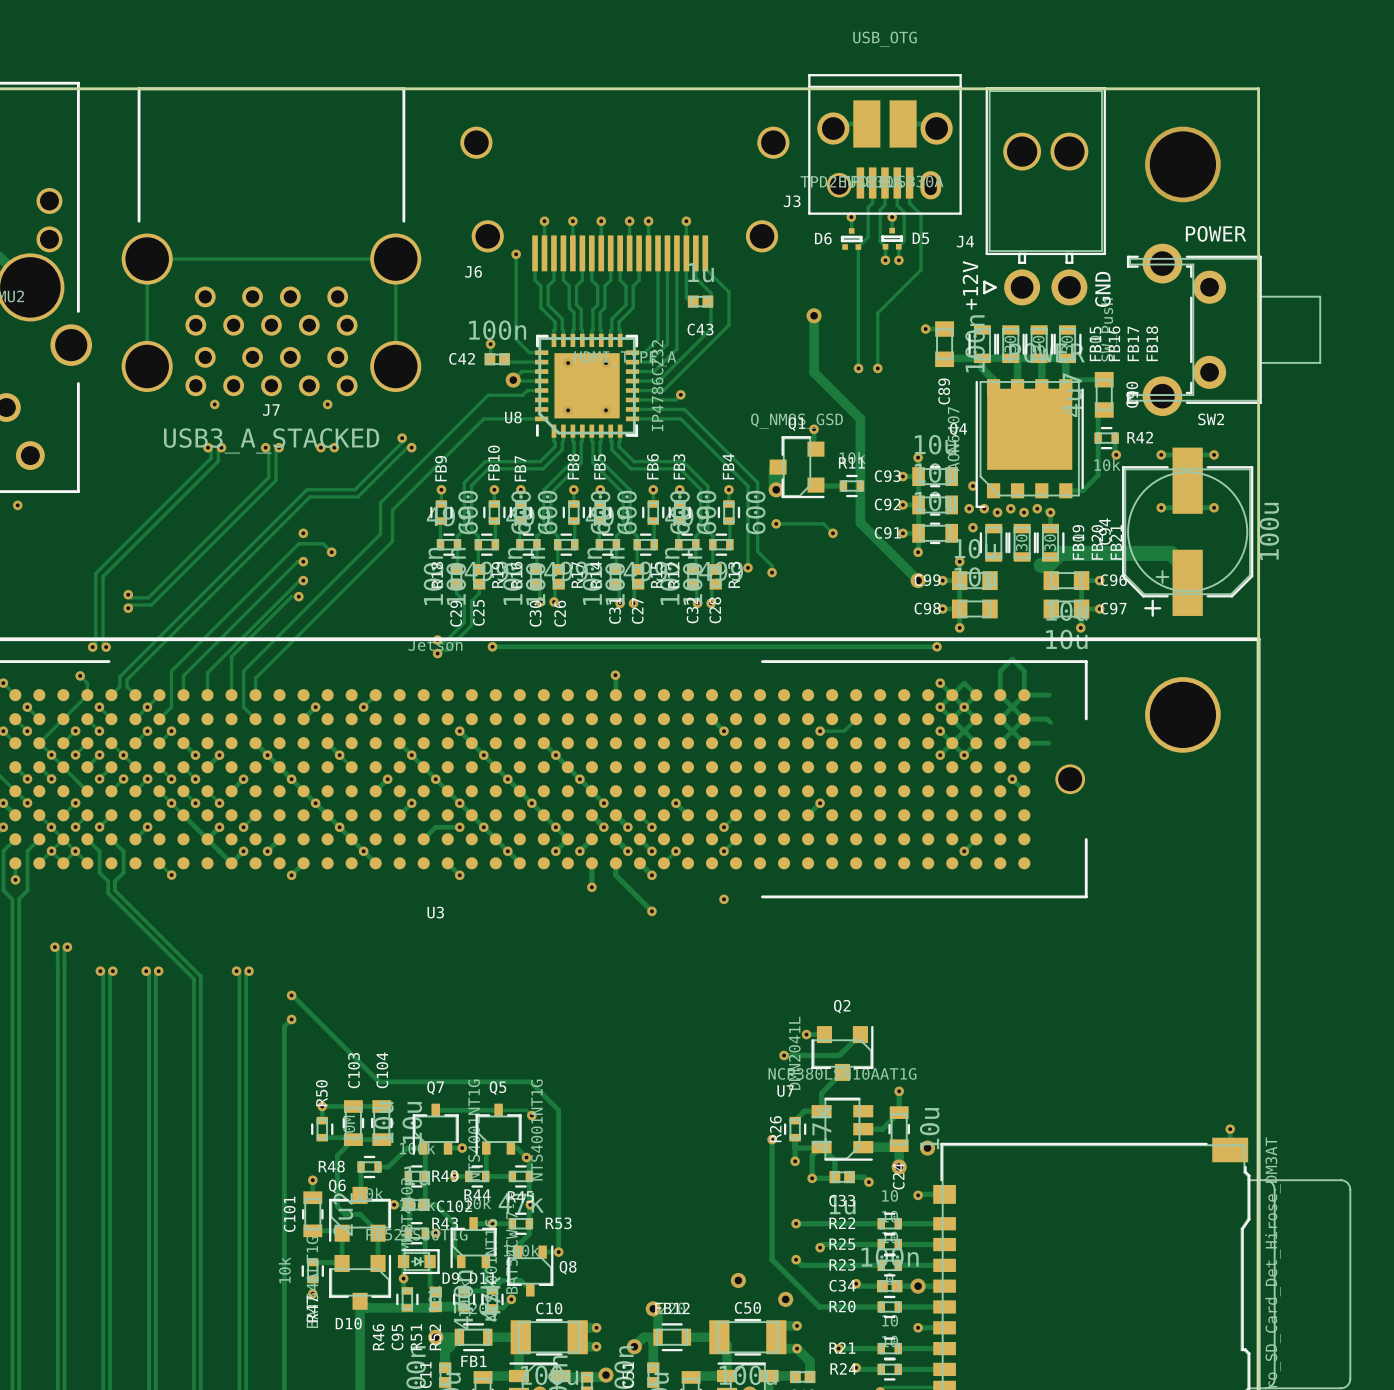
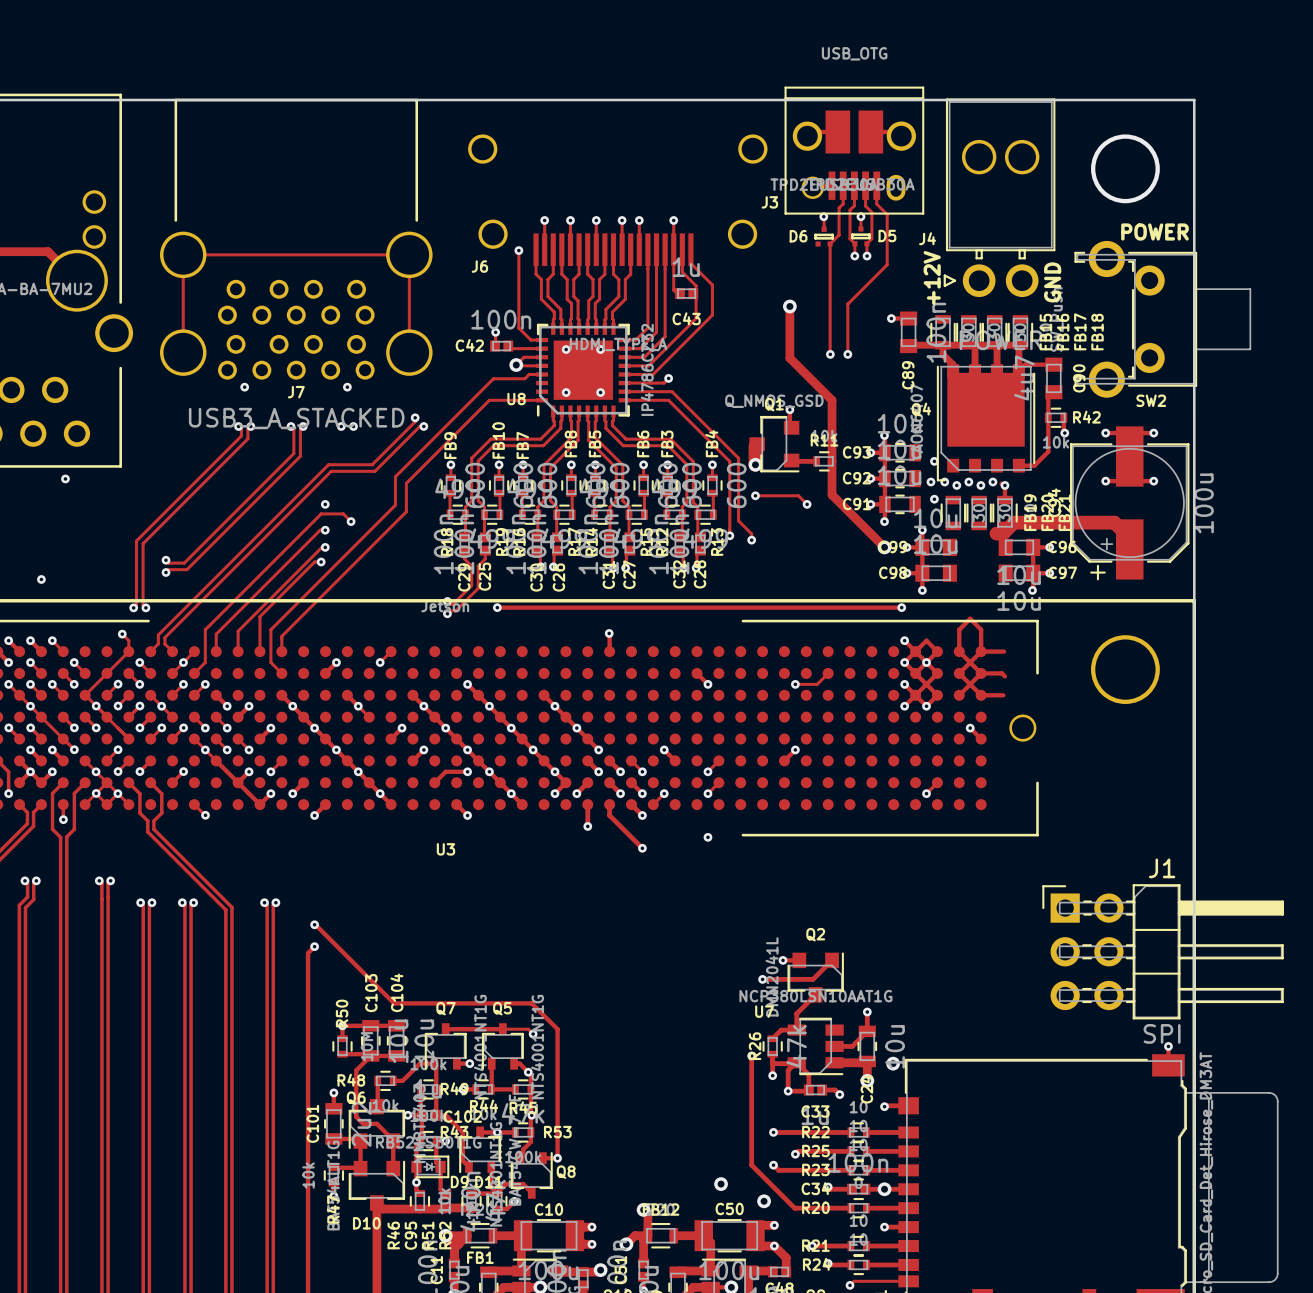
J1: none -> SPI (1163, 951)

